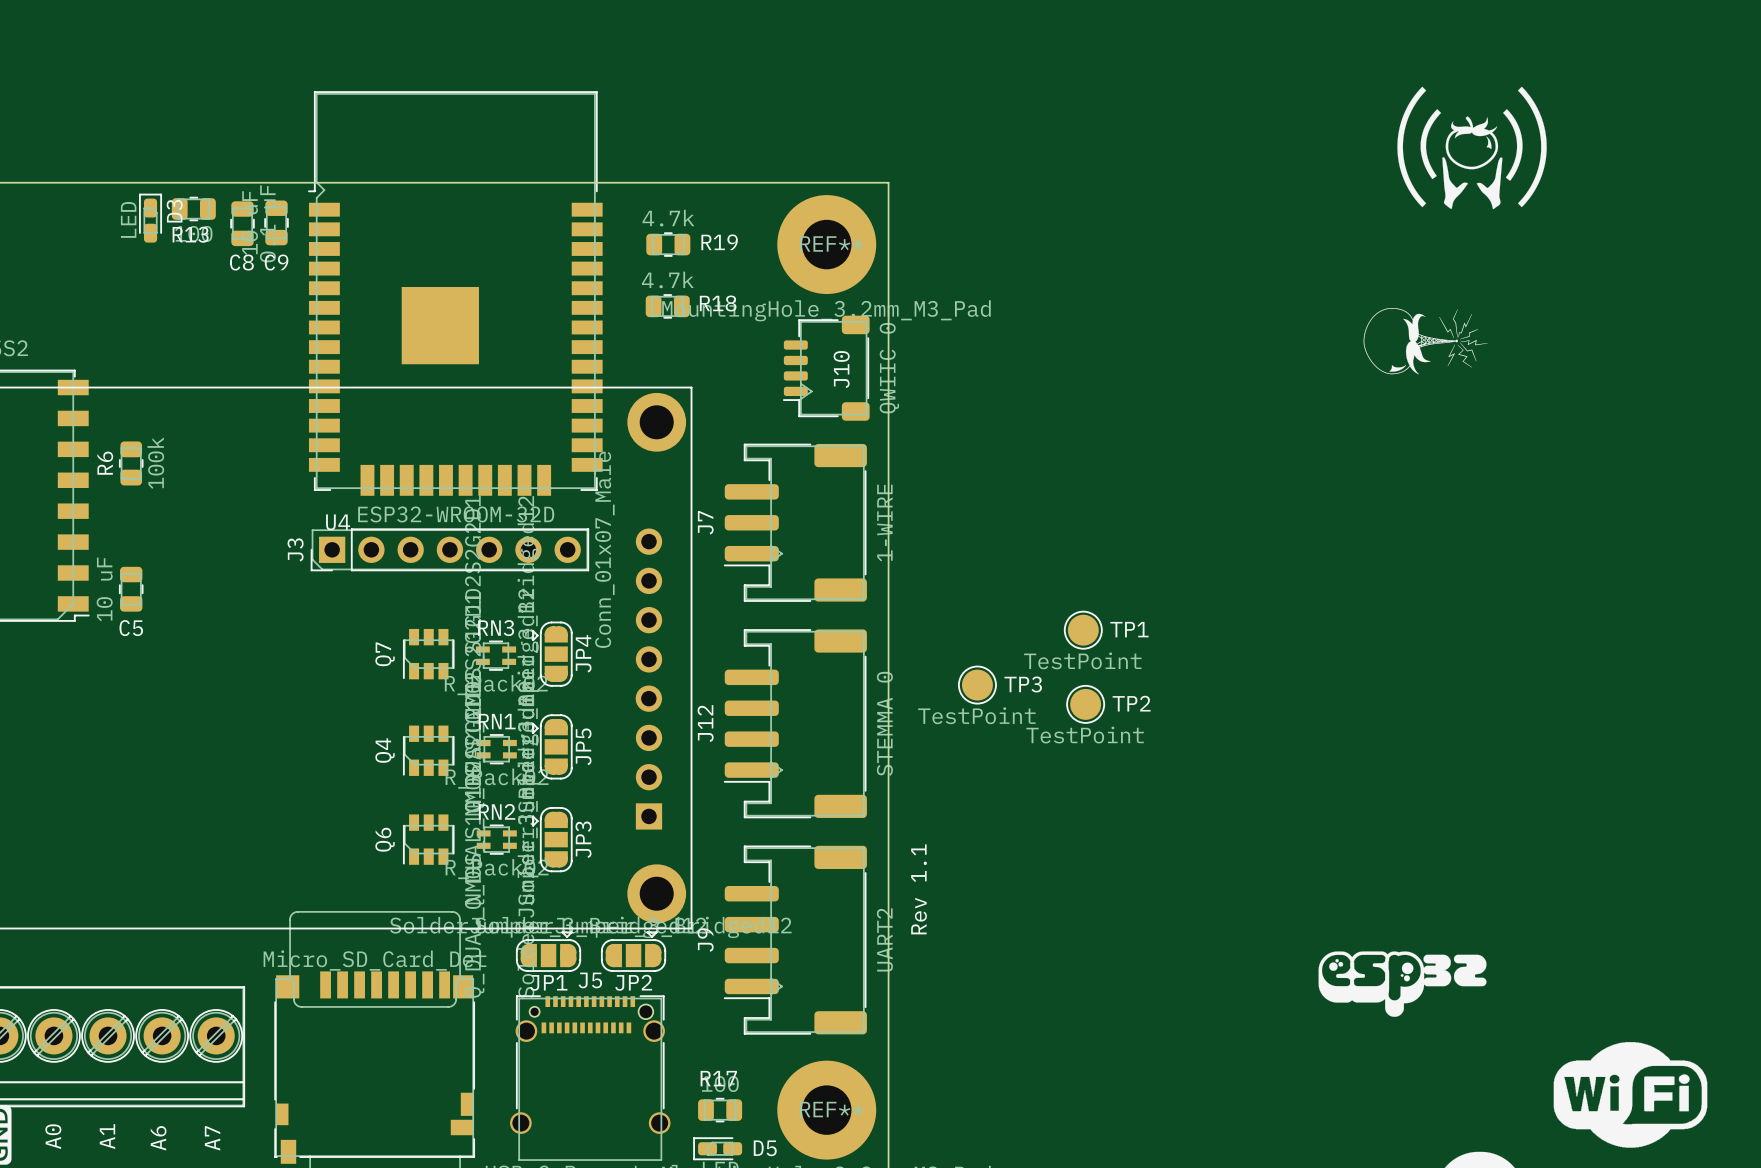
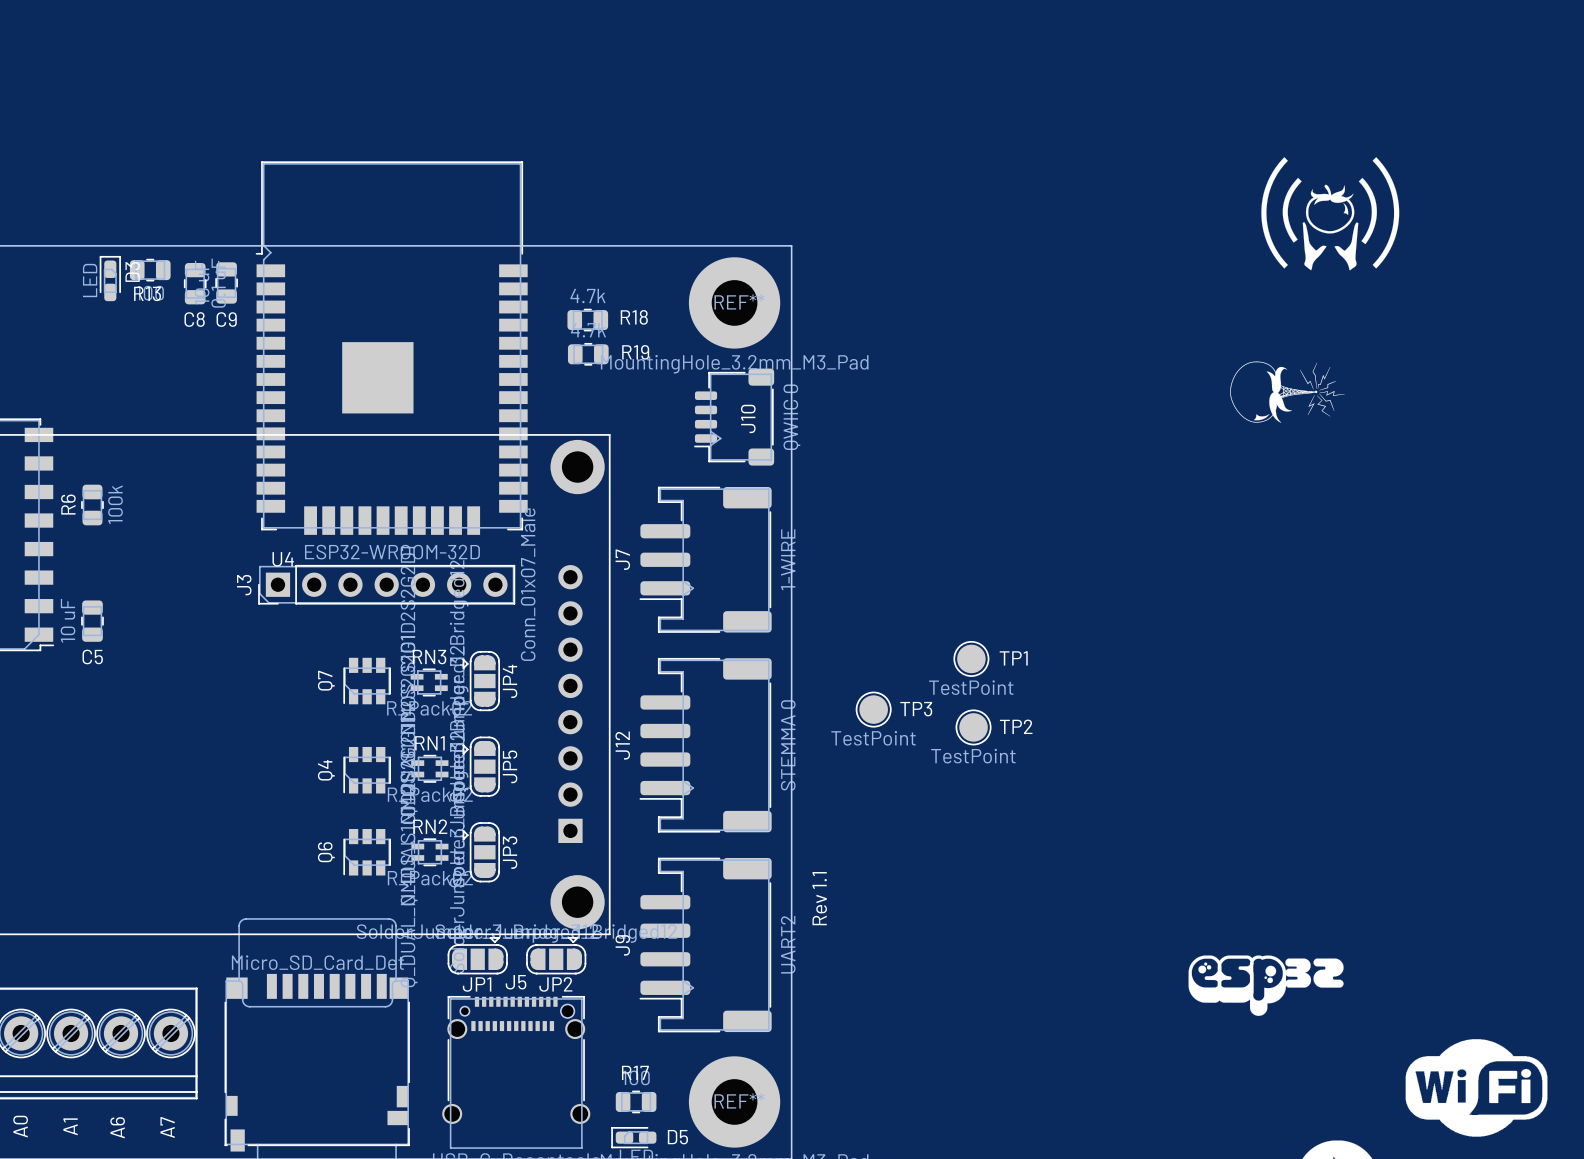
R19 position: (668, 244) -> (588, 354)
R18 position: (667, 306) -> (587, 320)

